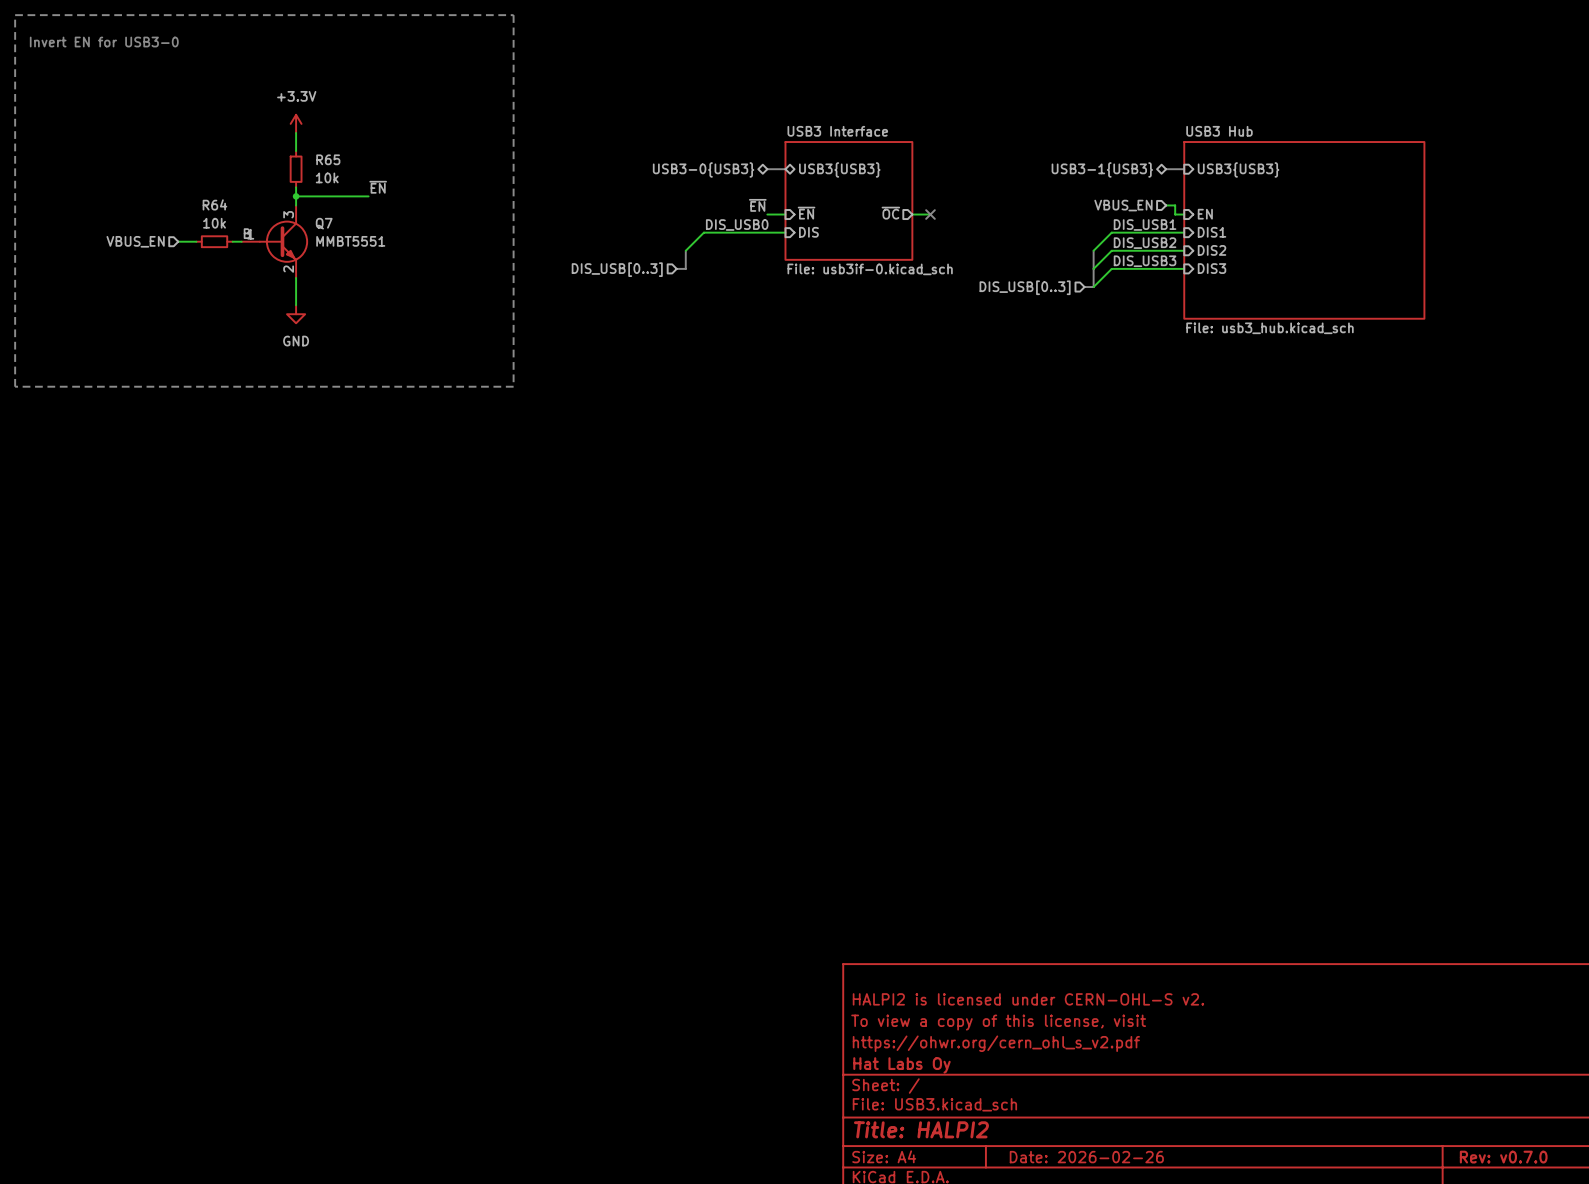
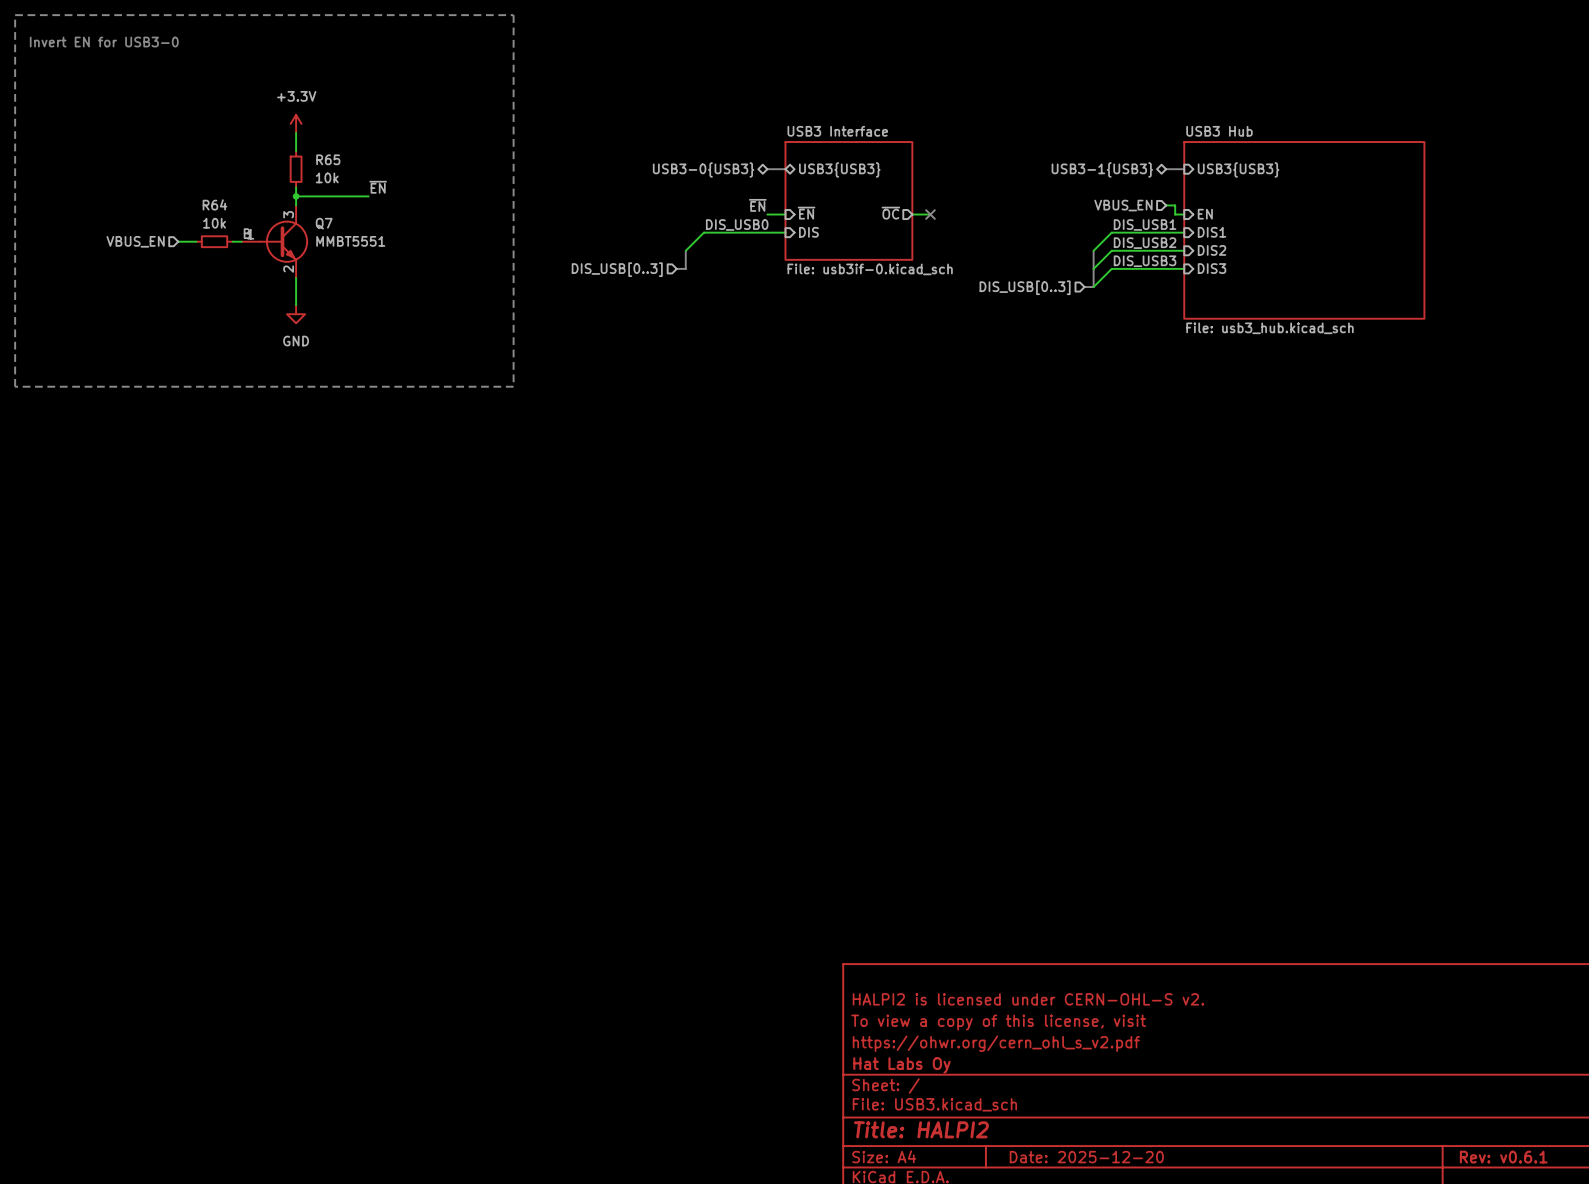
title block: Date: 2026-02-26 (1086, 1157) -> Date: 2025-12-20 (1086, 1157)
title block: Rev: v0.7.0 (1503, 1157) -> Rev: v0.6.1 (1503, 1157)

